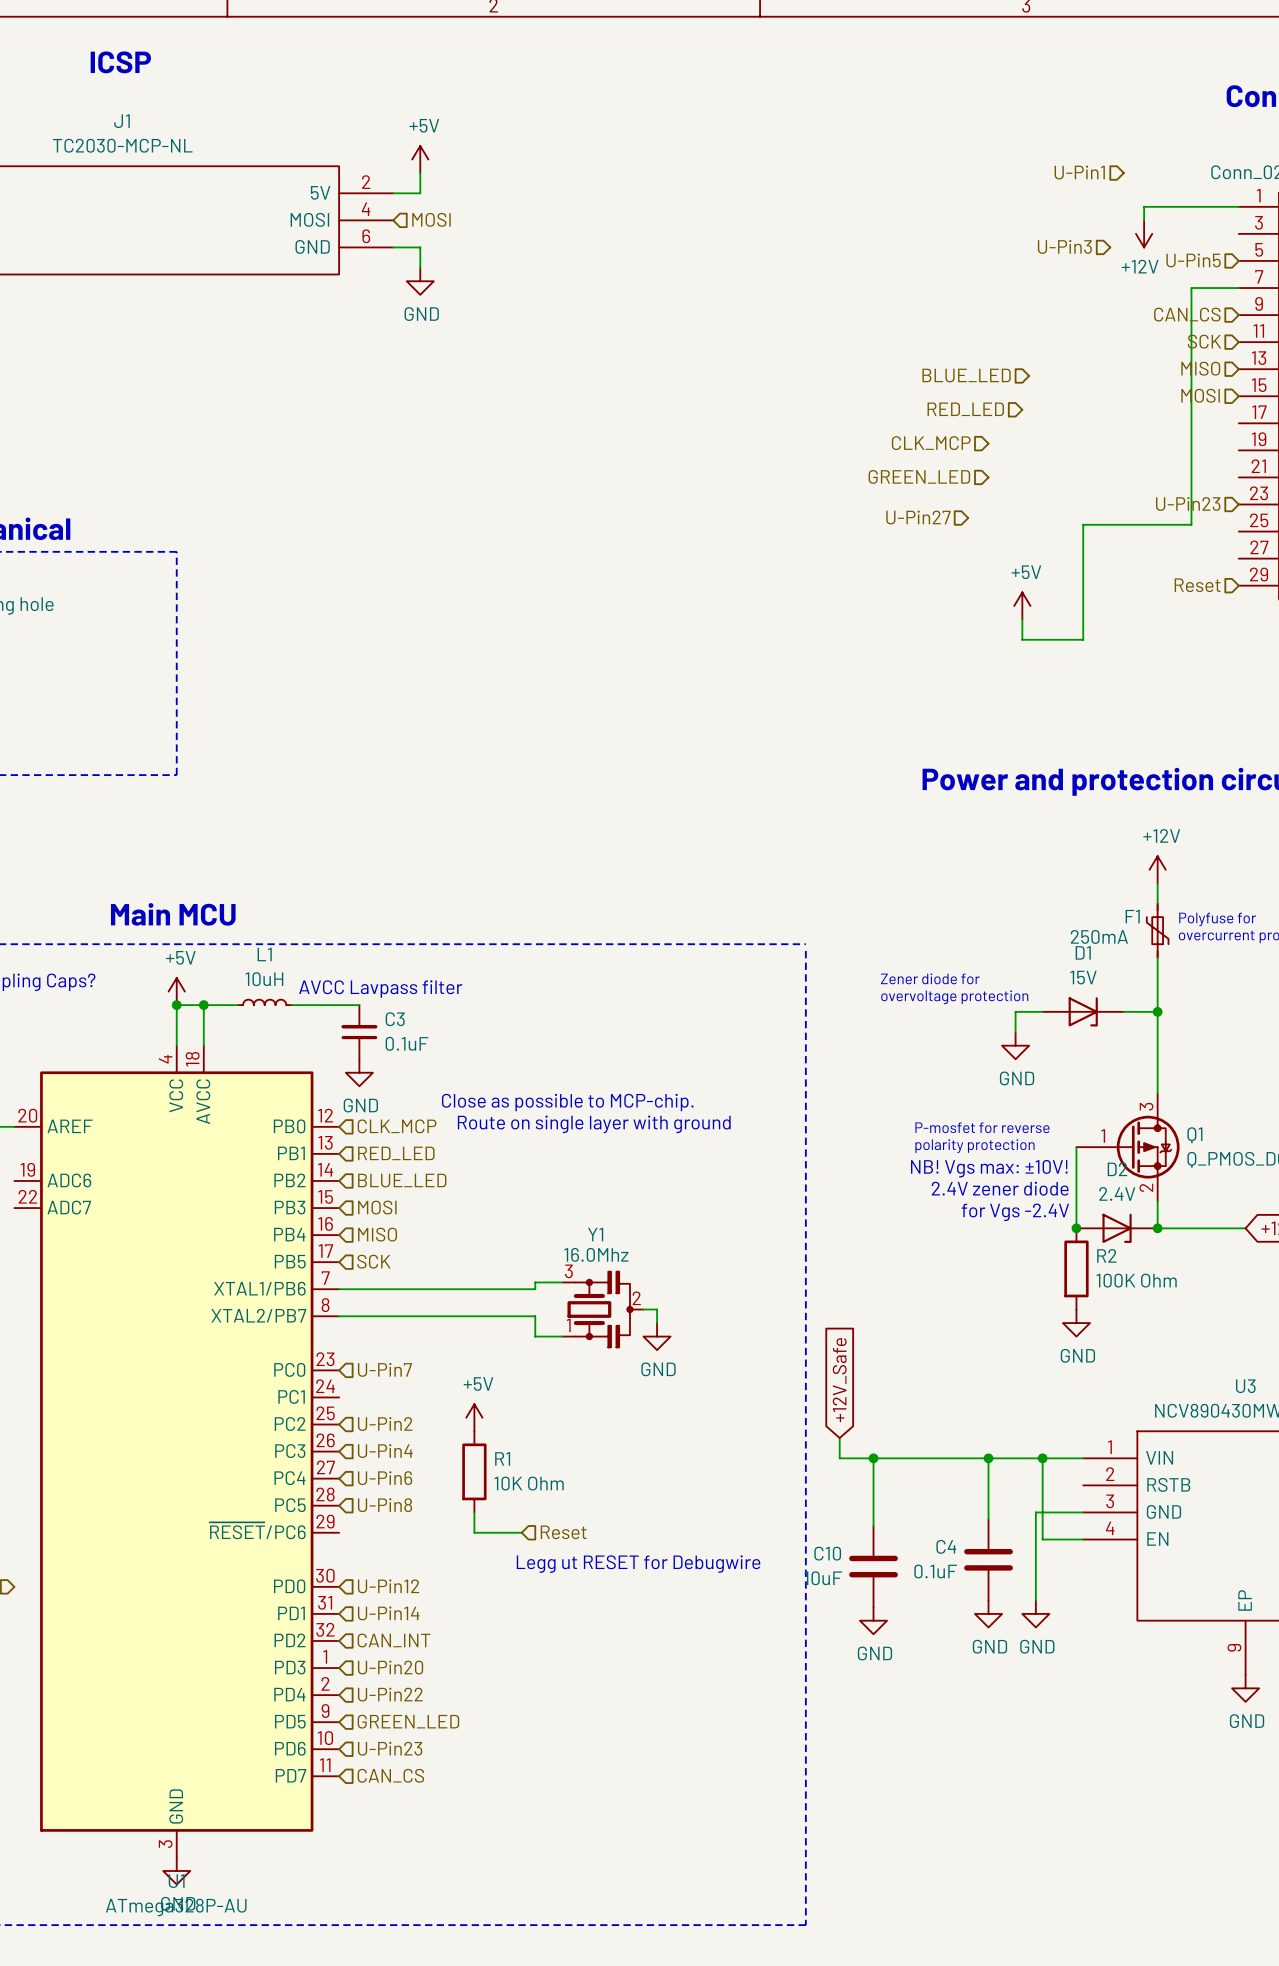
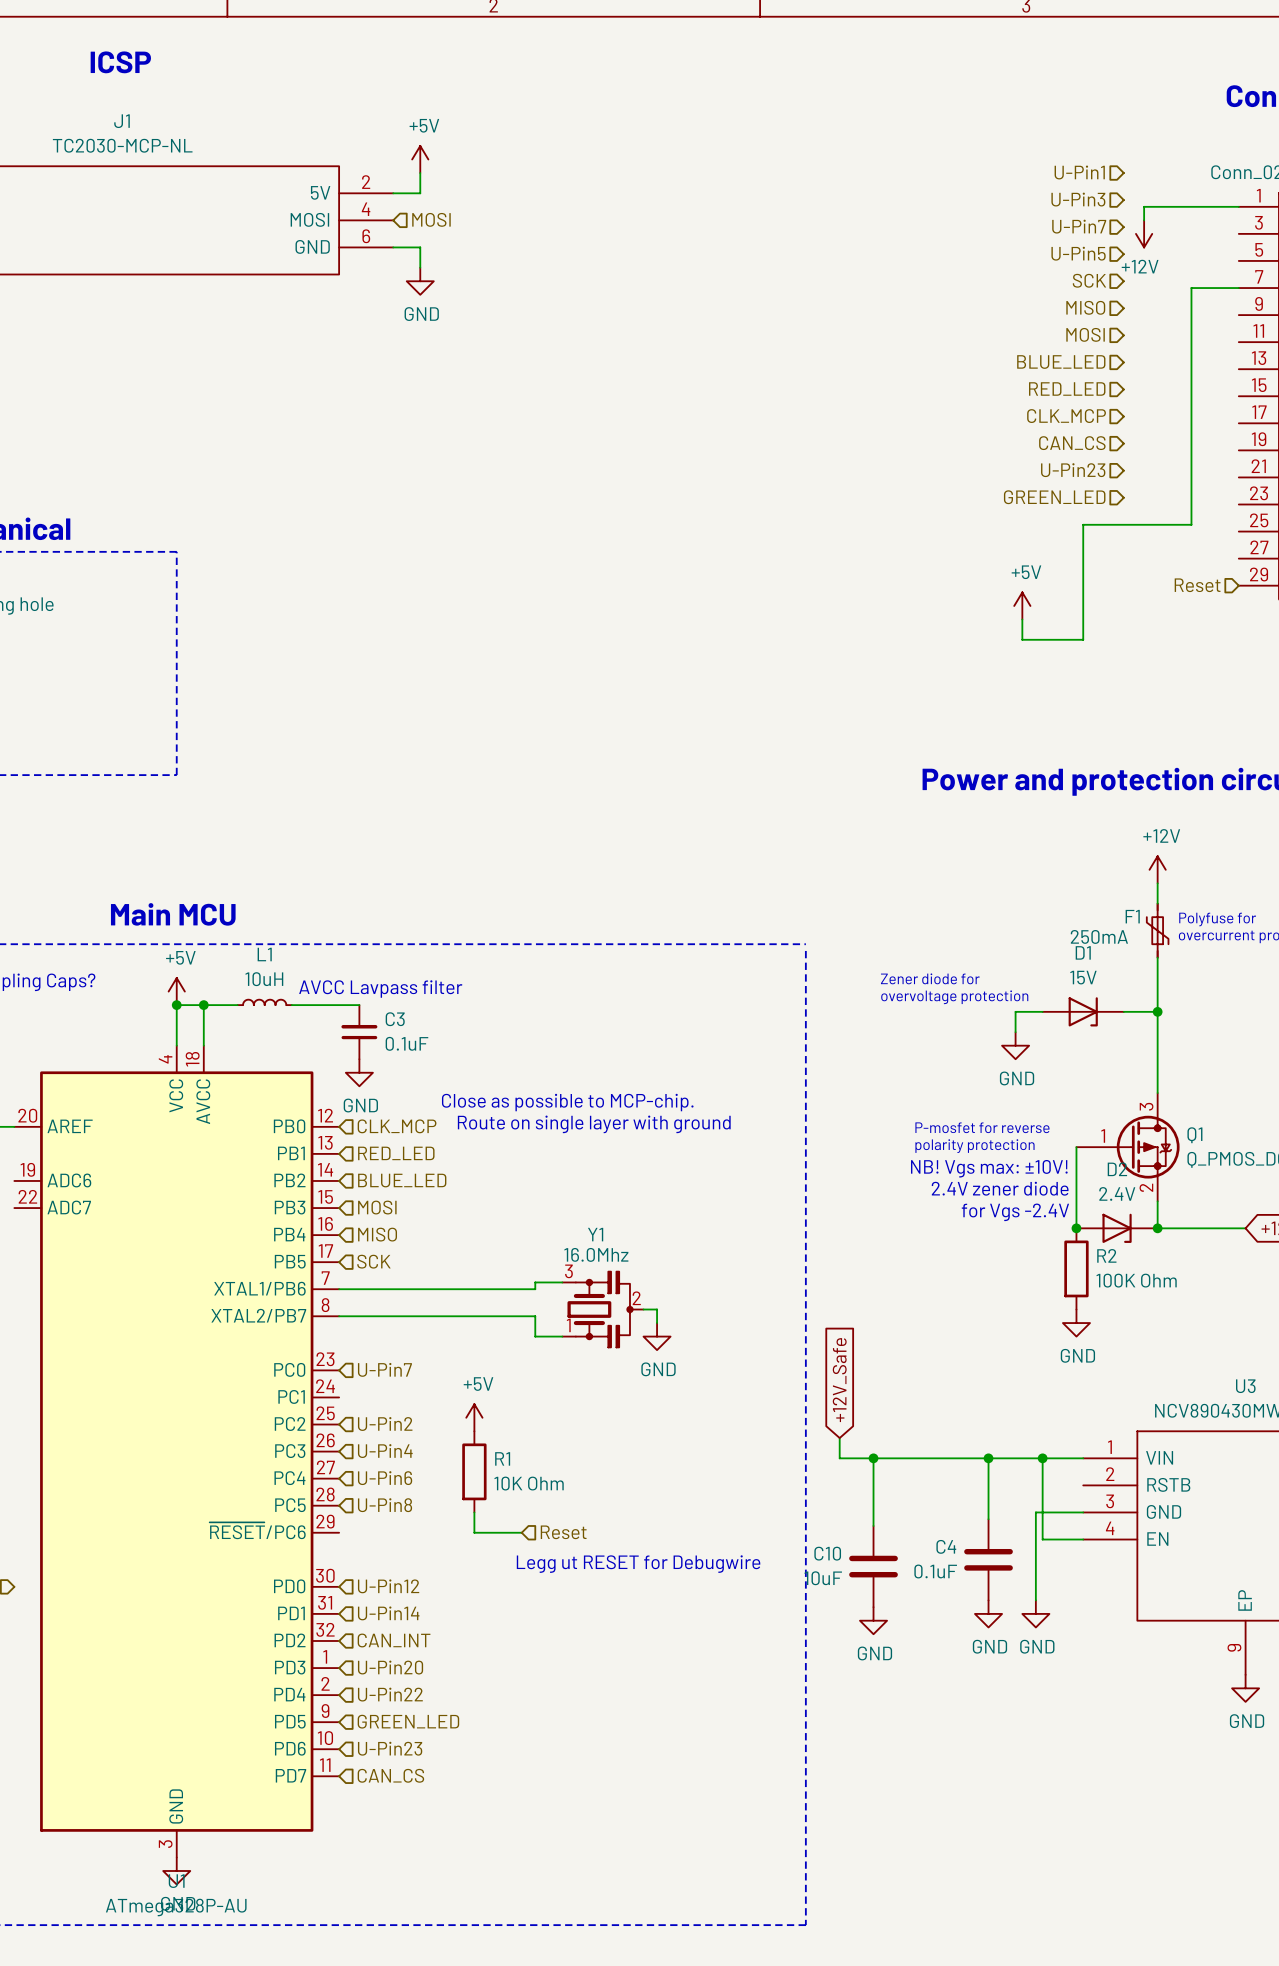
hierarchical label: none -> U-Pin7 (1079, 226)
hierarchical label position: U-Pin3 (1064, 246) -> U-Pin3 (1078, 199)
hierarchical label position: U-Pin5 (1193, 260) -> U-Pin5 (1078, 253)
hierarchical label position: CAN_CS (1187, 314) -> CAN_CS (1072, 443)
hierarchical label position: SCK (1204, 341) -> SCK (1089, 280)
hierarchical label position: MISO (1200, 368) -> MISO (1085, 307)
hierarchical label position: BLUE_LED (966, 375) -> BLUE_LED (1061, 362)
hierarchical label position: MOSI (1200, 395) -> MOSI (1085, 334)
hierarchical label position: RED_LED (965, 409) -> RED_LED (1067, 388)
hierarchical label position: CLK_MCP (931, 443) -> CLK_MCP (1066, 416)
hierarchical label position: GREEN_LED (919, 476) -> GREEN_LED (1054, 497)
hierarchical label position: U-Pin23 (1188, 503) -> U-Pin23 (1073, 470)
hierarchical label: U-Pin27 (918, 517) -> none

